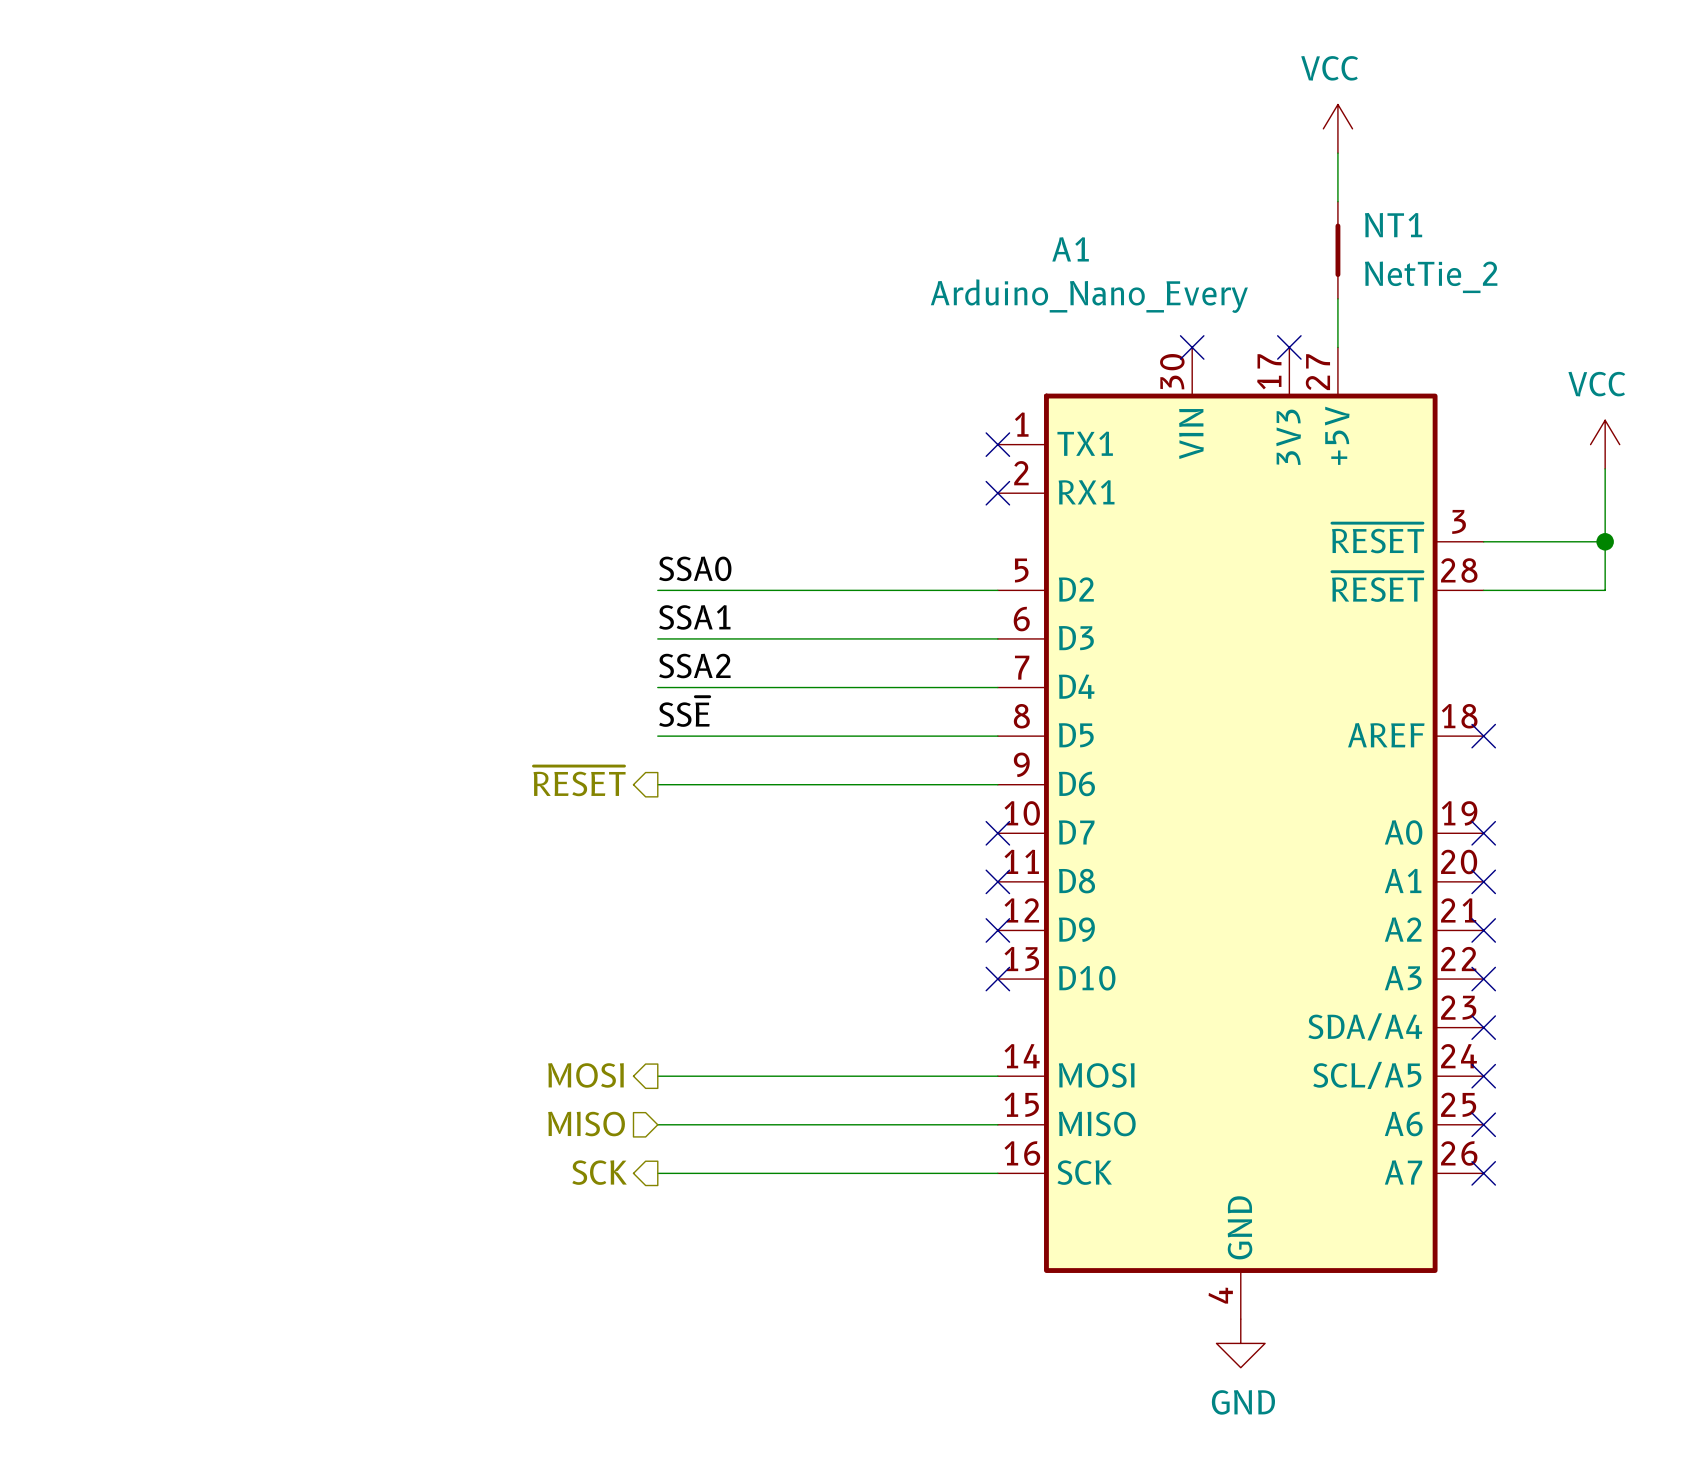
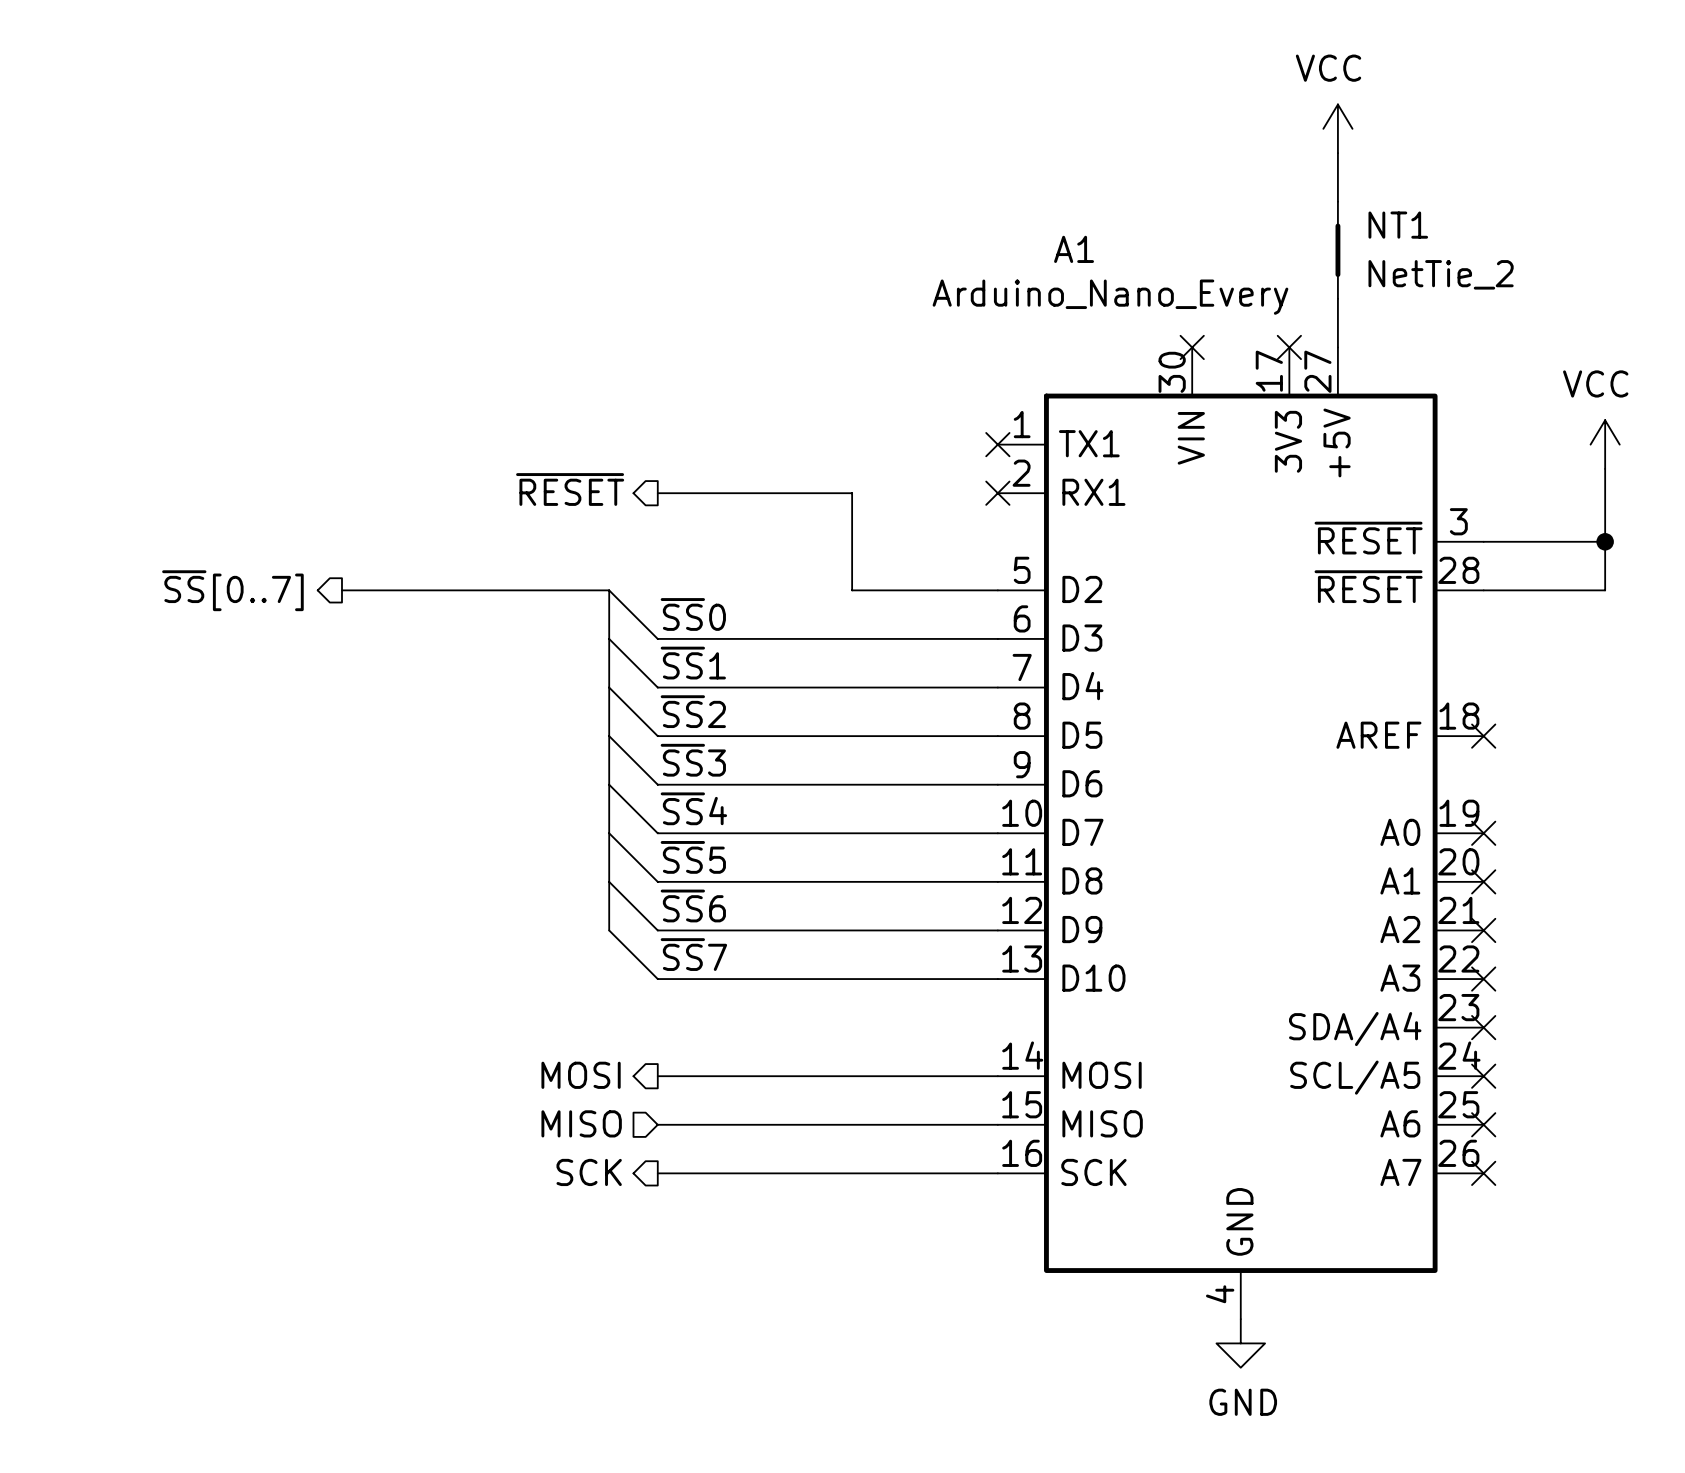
label: SSA0 (695, 568) -> none
hierarchical label: none -> ~{SS}[0..7] (232, 590)
bus: none -> (341, 590) (609, 590) (609, 930)
wire: none -> (609, 590) (657, 638)
wire: (657, 590) (852, 590) -> (657, 493) (852, 493) (852, 590)
label: SSA1 (694, 617) -> ~{SS}0 (693, 614)
wire: none -> (609, 638) (657, 687)
label: SSA2 (694, 665) -> ~{SS}1 (693, 663)
wire: none -> (609, 687) (657, 736)
label: SS~{E} (684, 711) -> ~{SS}2 (693, 711)
wire: none -> (609, 736) (657, 784)
label: none -> ~{SS}3 (693, 760)
hierarchical label position: ~{RESET} (579, 781) -> ~{RESET} (570, 489)
wire: none -> (609, 784) (657, 833) (997, 833)
label: none -> ~{SS}4 (693, 808)
wire: none -> (609, 833) (657, 881) (997, 881)
no-connect mark: (997, 833) -> none
label: none -> ~{SS}5 (693, 857)
wire: none -> (609, 881) (657, 930) (997, 930)
no-connect mark: (997, 881) -> none
label: none -> ~{SS}6 (693, 905)
wire: none -> (609, 930) (657, 979) (997, 979)
no-connect mark: (997, 930) -> none
label: none -> ~{SS}7 (693, 954)
no-connect mark: (997, 979) -> none

